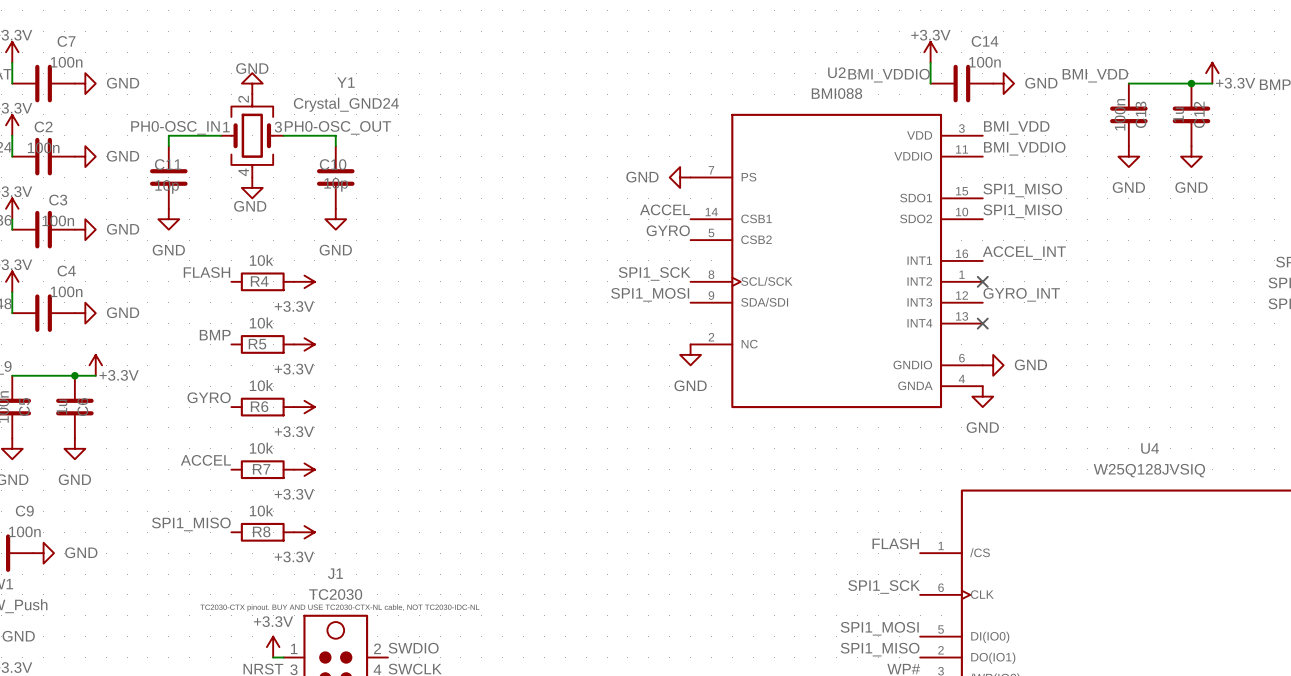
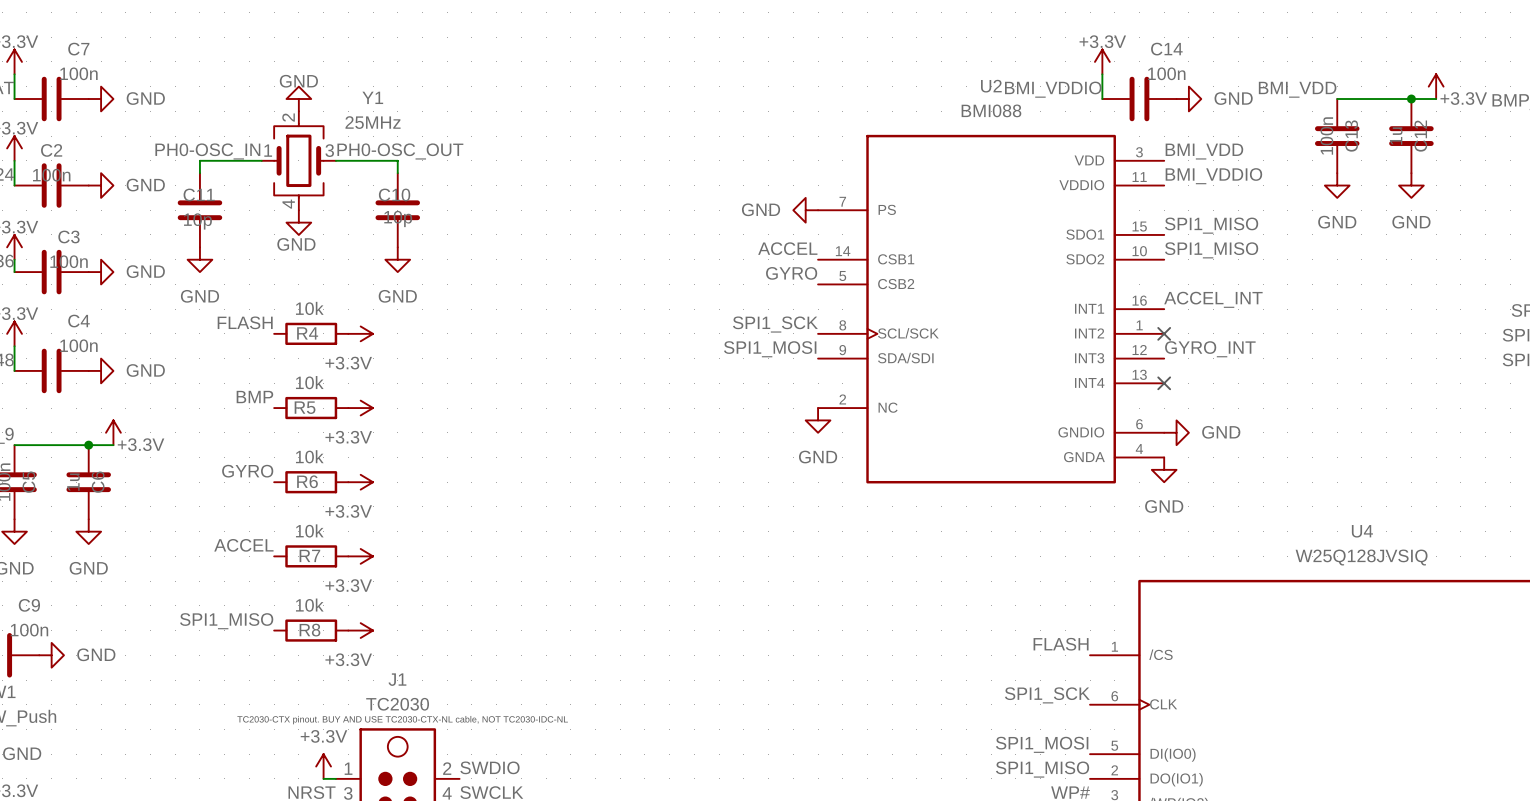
Y1 name position: Y1 (346, 82) -> Y1 (372, 97)
Y1 value: Crystal_GND24 (346, 104) -> 25MHz (373, 122)

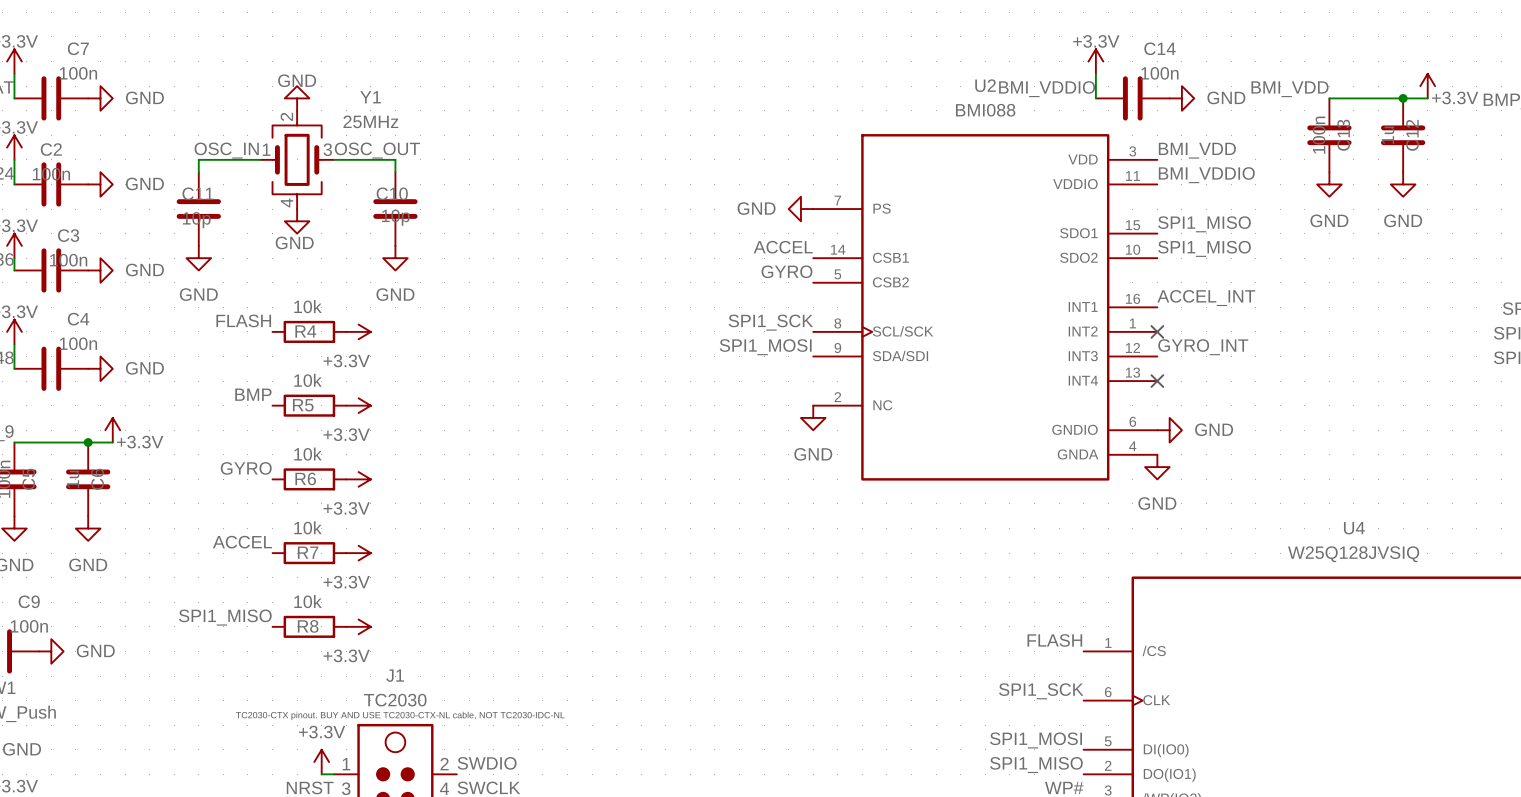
label: PH0-OSC_IN (207, 151) -> OSC_IN (226, 150)
label: PH0-OSC_OUT (400, 151) -> OSC_OUT (377, 150)

